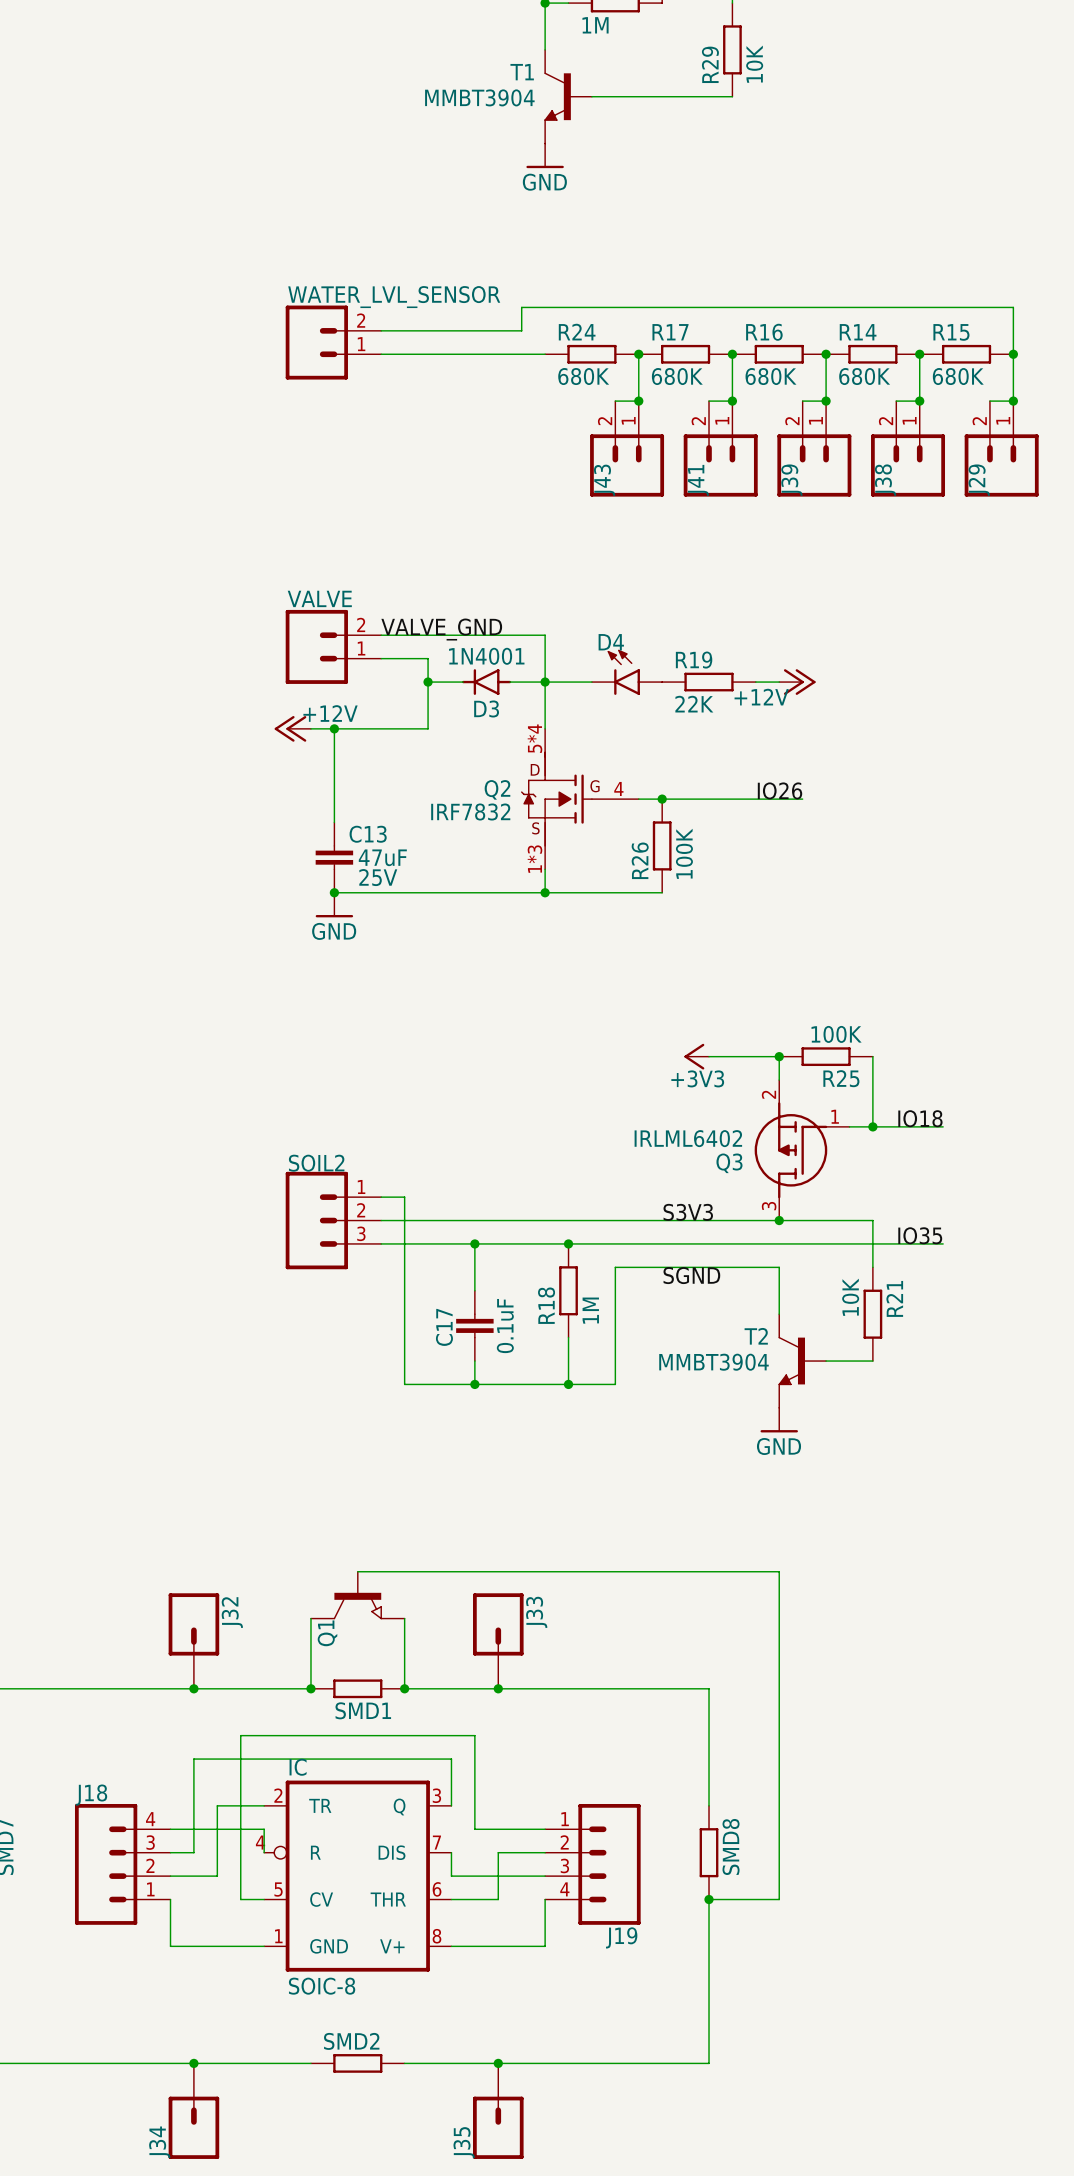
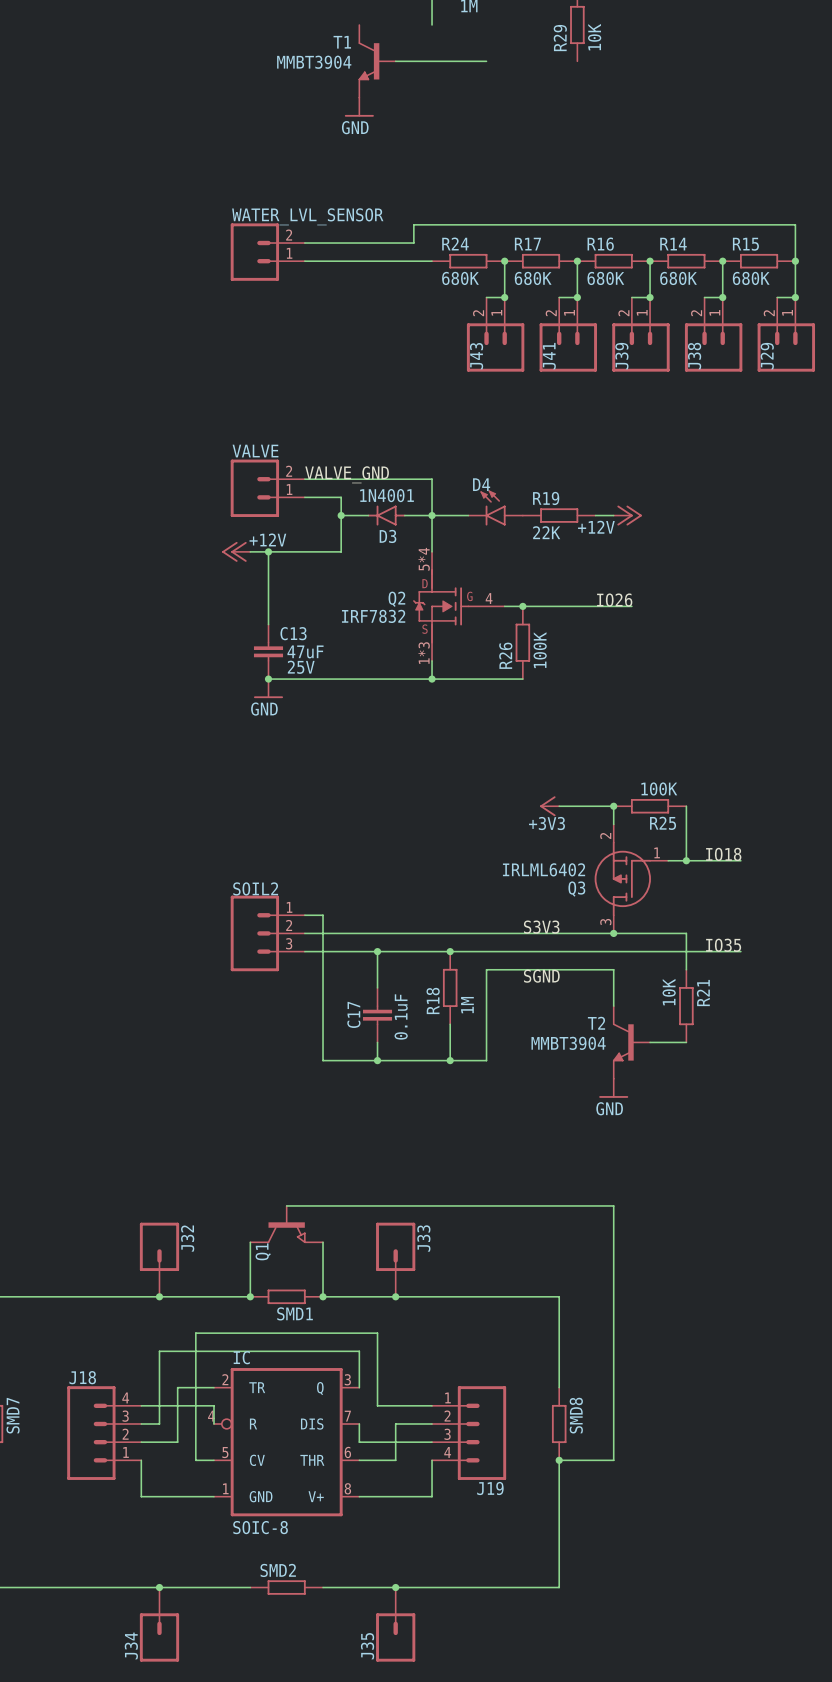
wire: none -> (395, 61) (468, 61)
T1 position: (568, 96) -> (377, 61)
wire: (615, 96) (732, 96) -> none
power symbol position: GND (545, 155) -> GND (359, 107)

